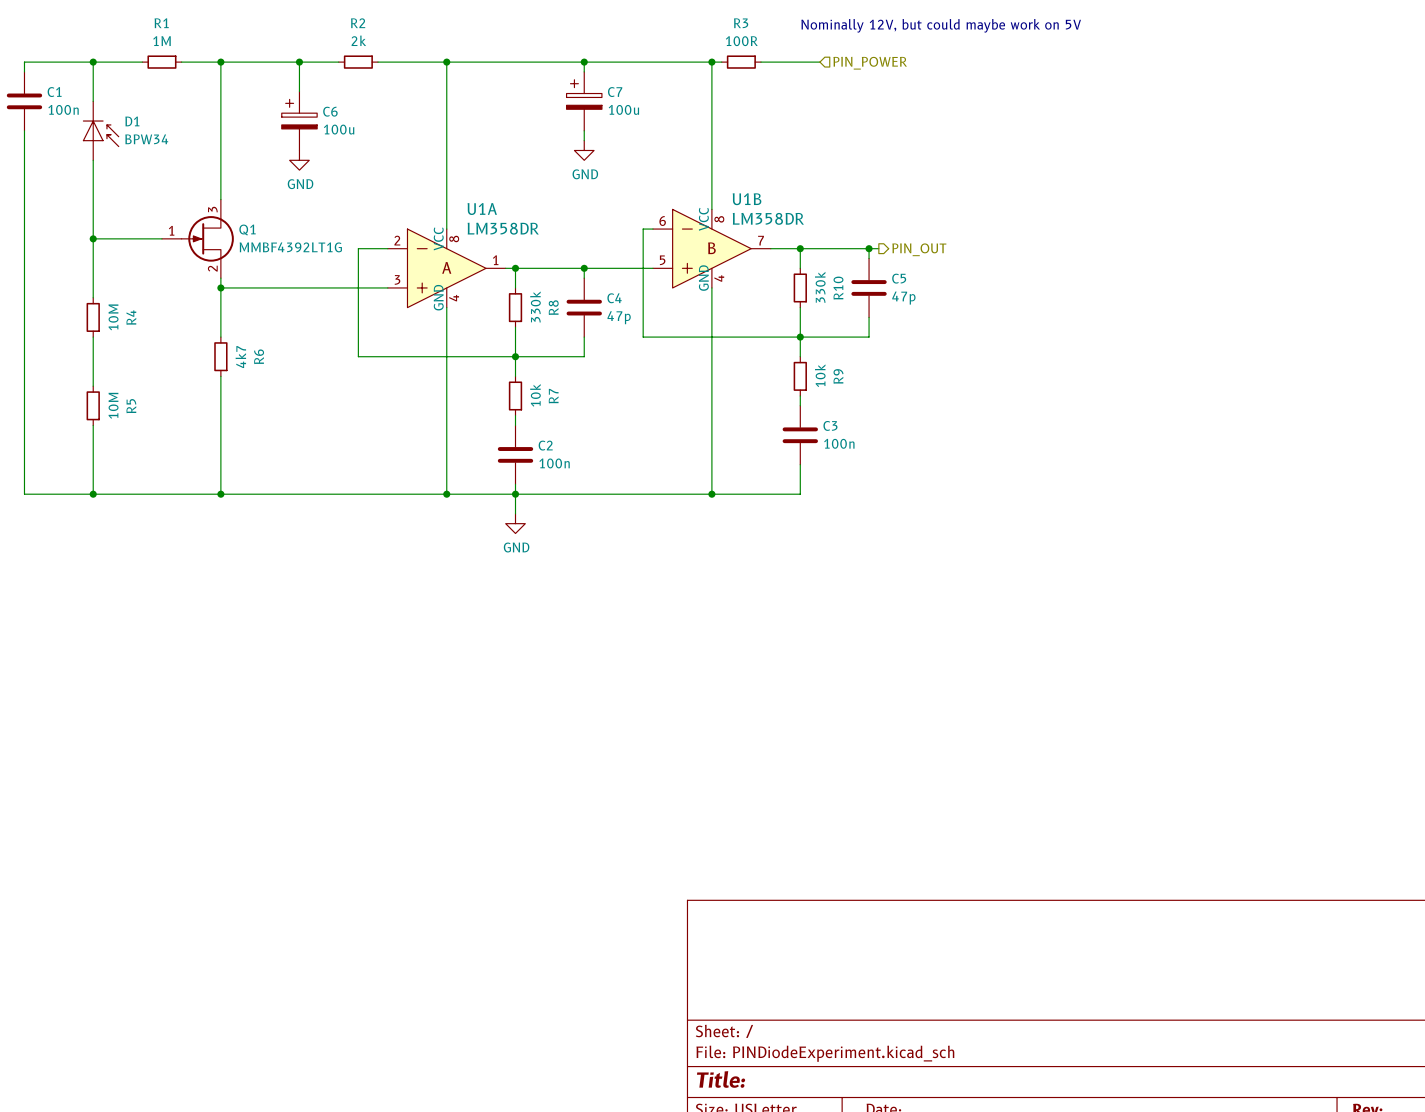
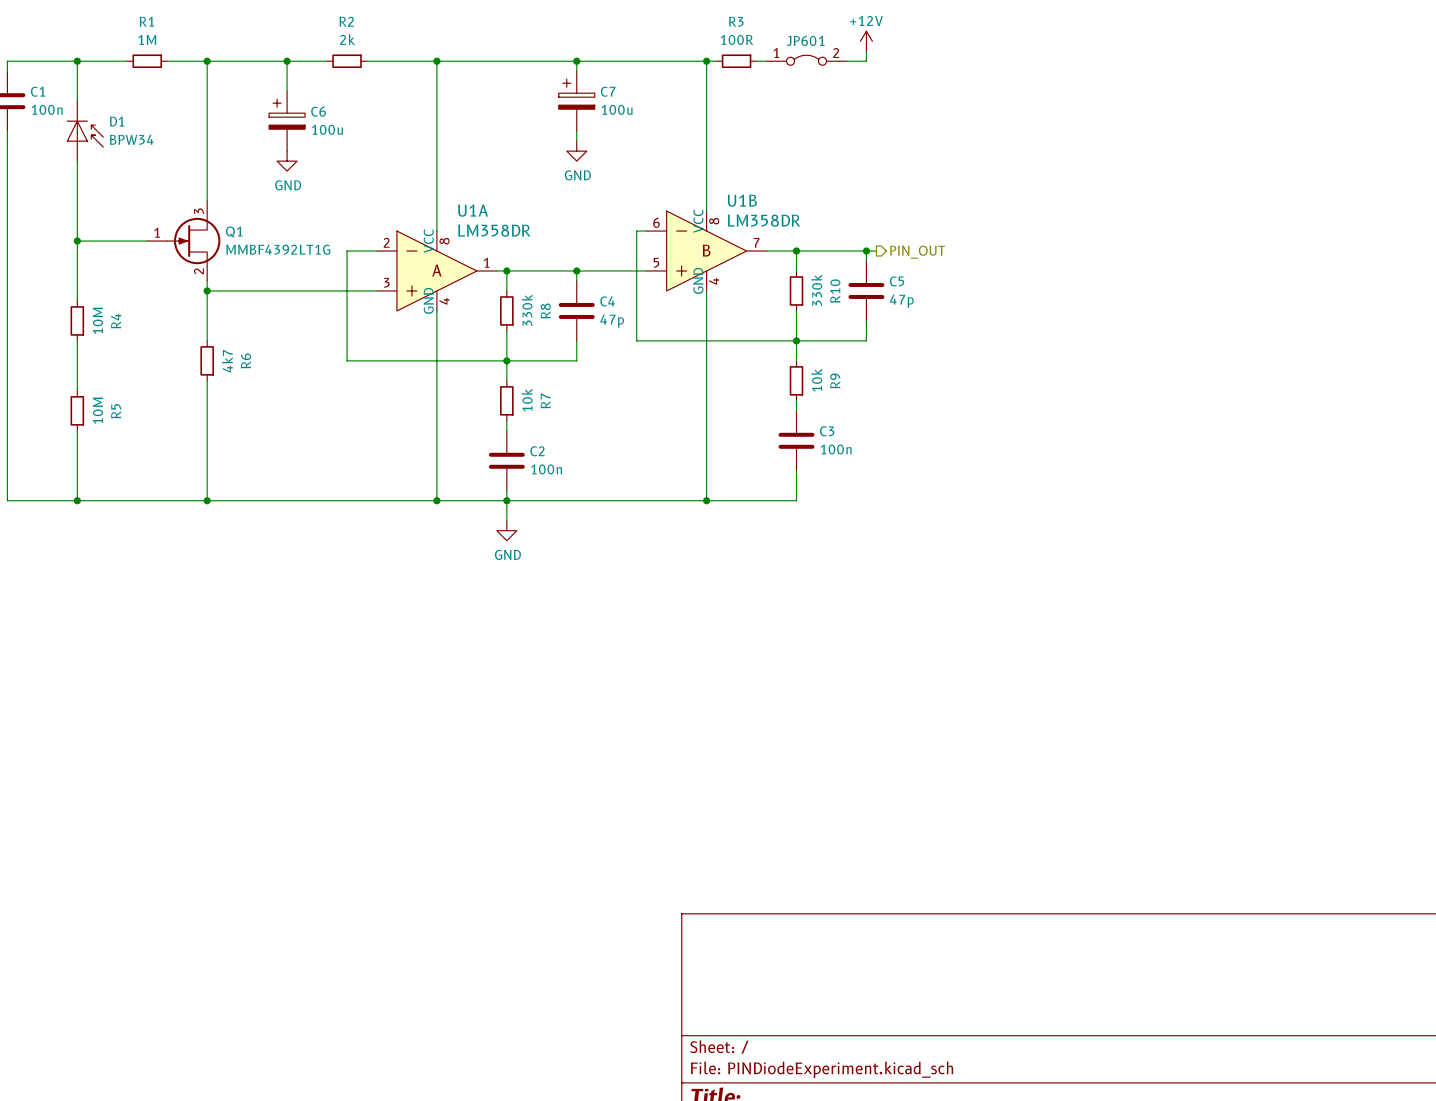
text: Nominally 12V, but could maybe work on 5V (941, 25) -> none
power symbol: none -> +12V (866, 41)
wire: none -> (866, 51) (866, 61) (846, 61)
JP601: none -> (806, 60)
wire: (770, 62) (819, 62) -> none
hierarchical label: PIN_POWER (870, 63) -> none

